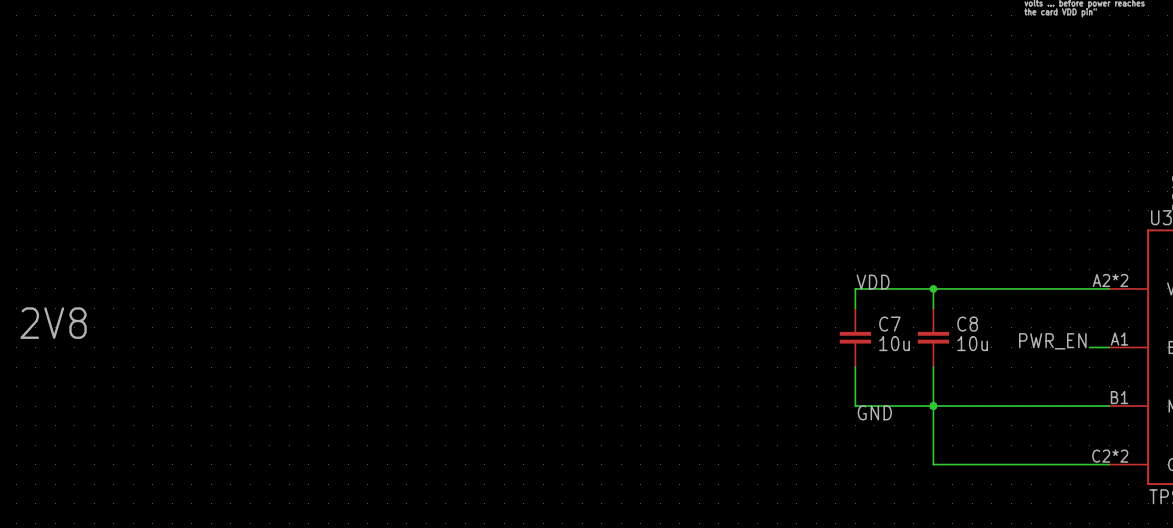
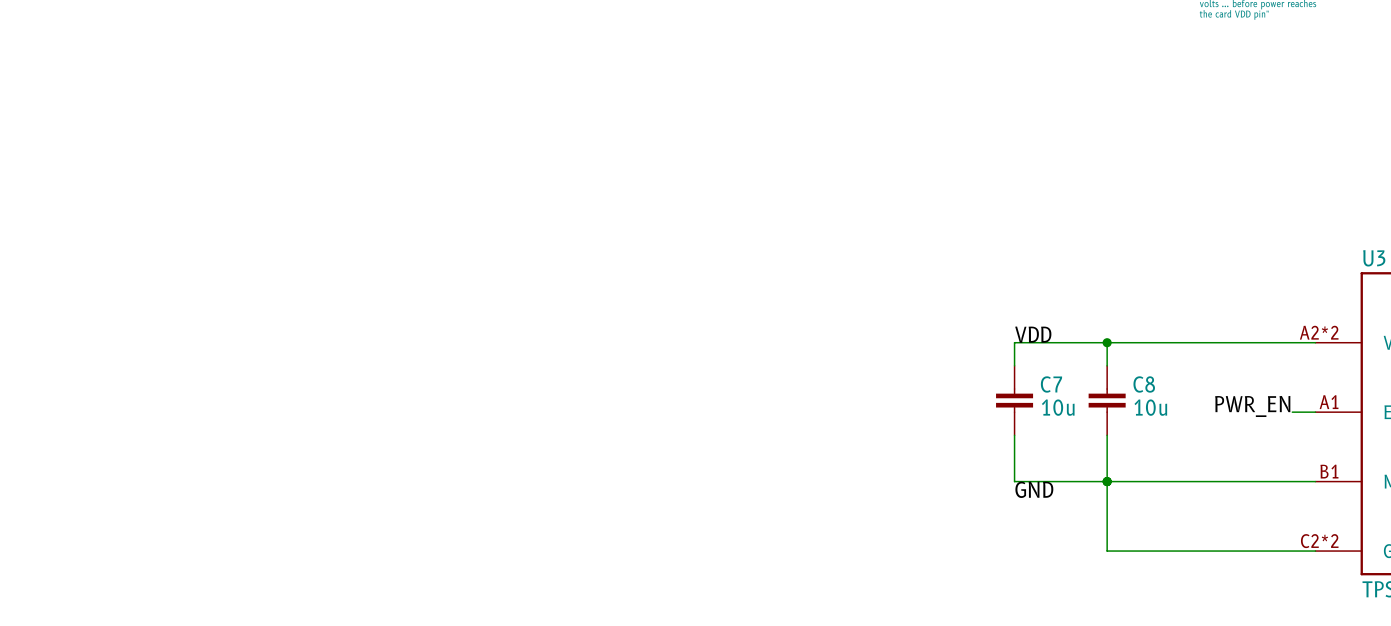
text: 2V8 (53, 323) -> none

